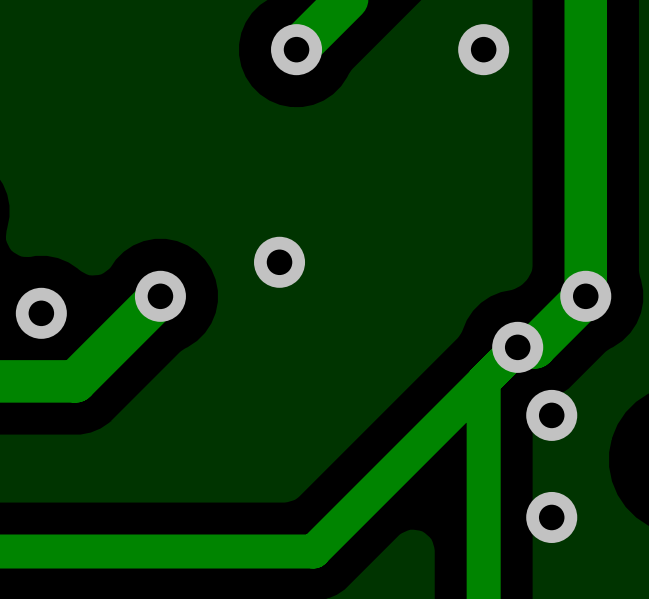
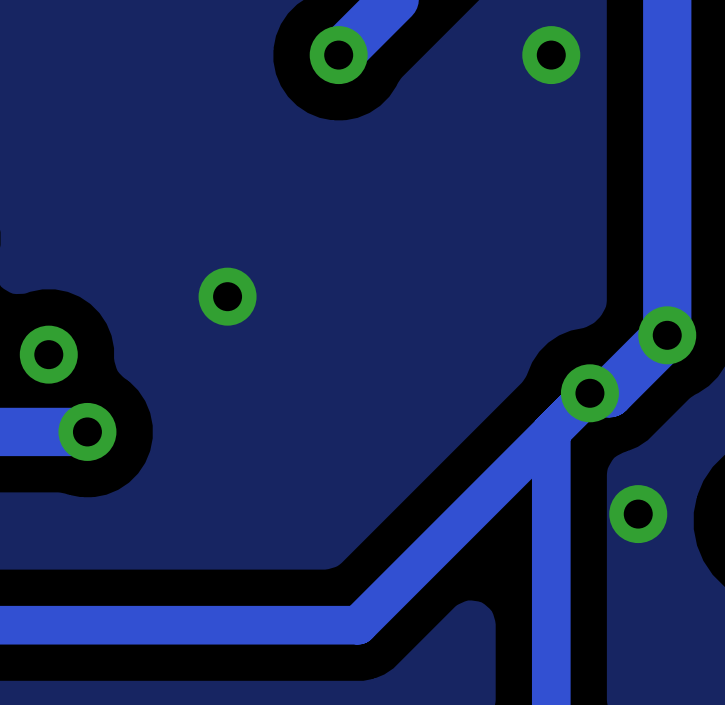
via: (279, 262) -> none
track: (160, 296) (75, 381) -> none
via position: (160, 296) -> (227, 296)
via: none -> (87, 431)
via position: (551, 415) -> (638, 514)
via: (551, 517) -> none

